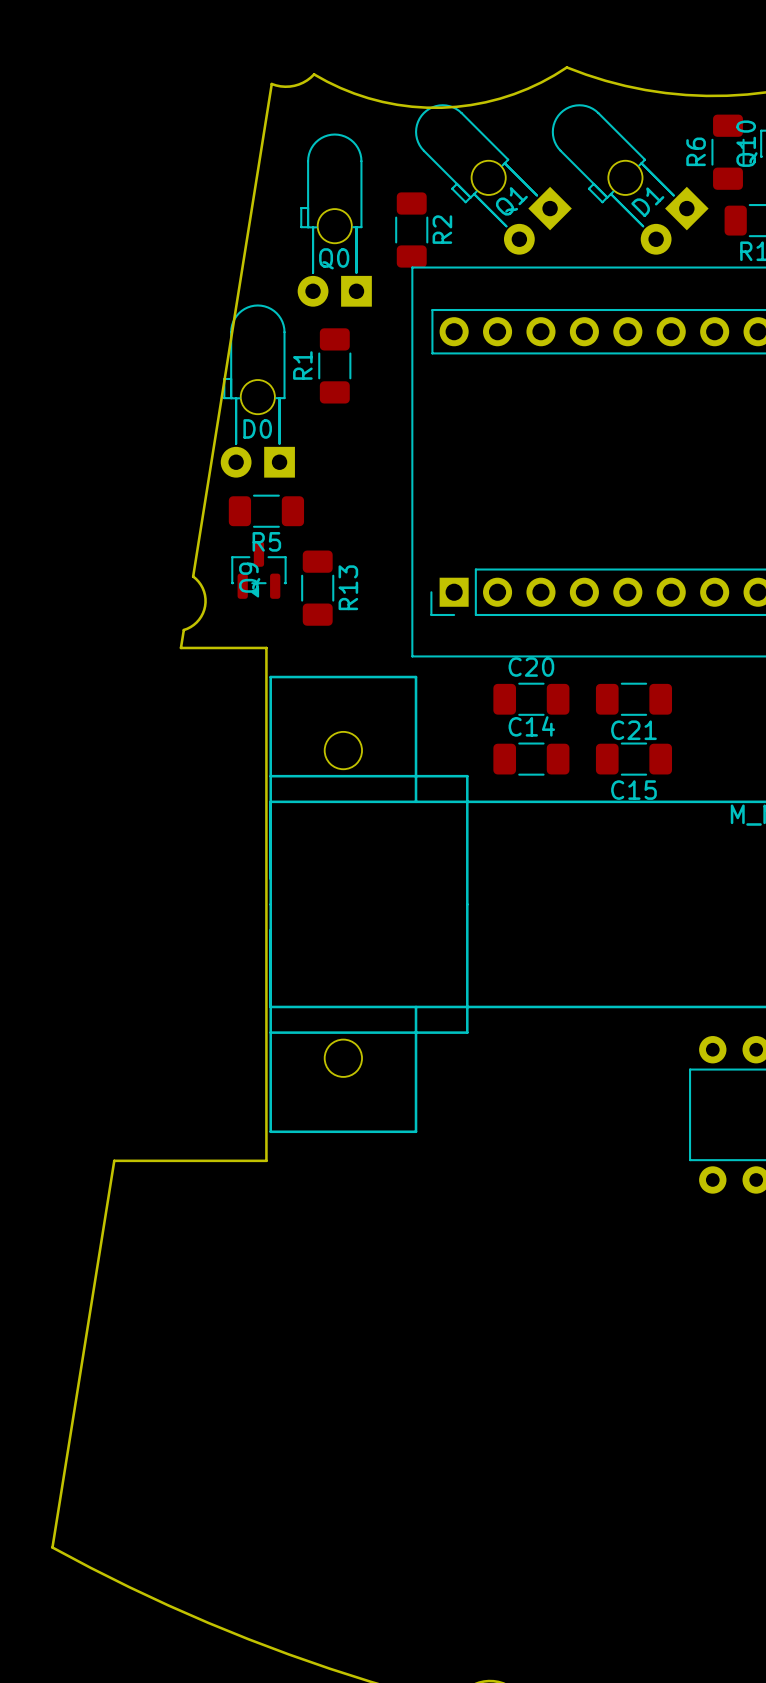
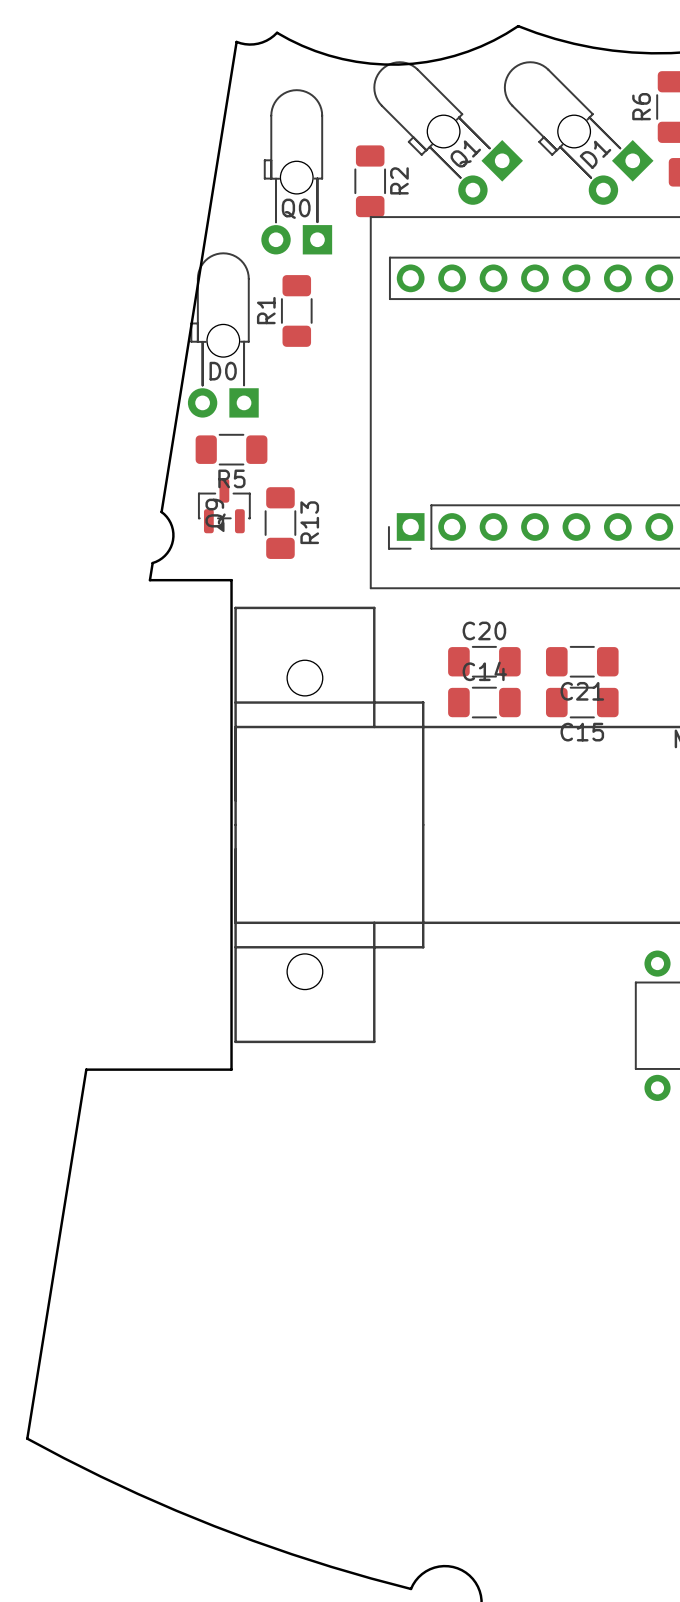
C20 position: (531, 699) -> (484, 661)
C21 position: (633, 699) -> (582, 661)
C14 position: (531, 759) -> (484, 702)
C15 position: (633, 759) -> (582, 702)

